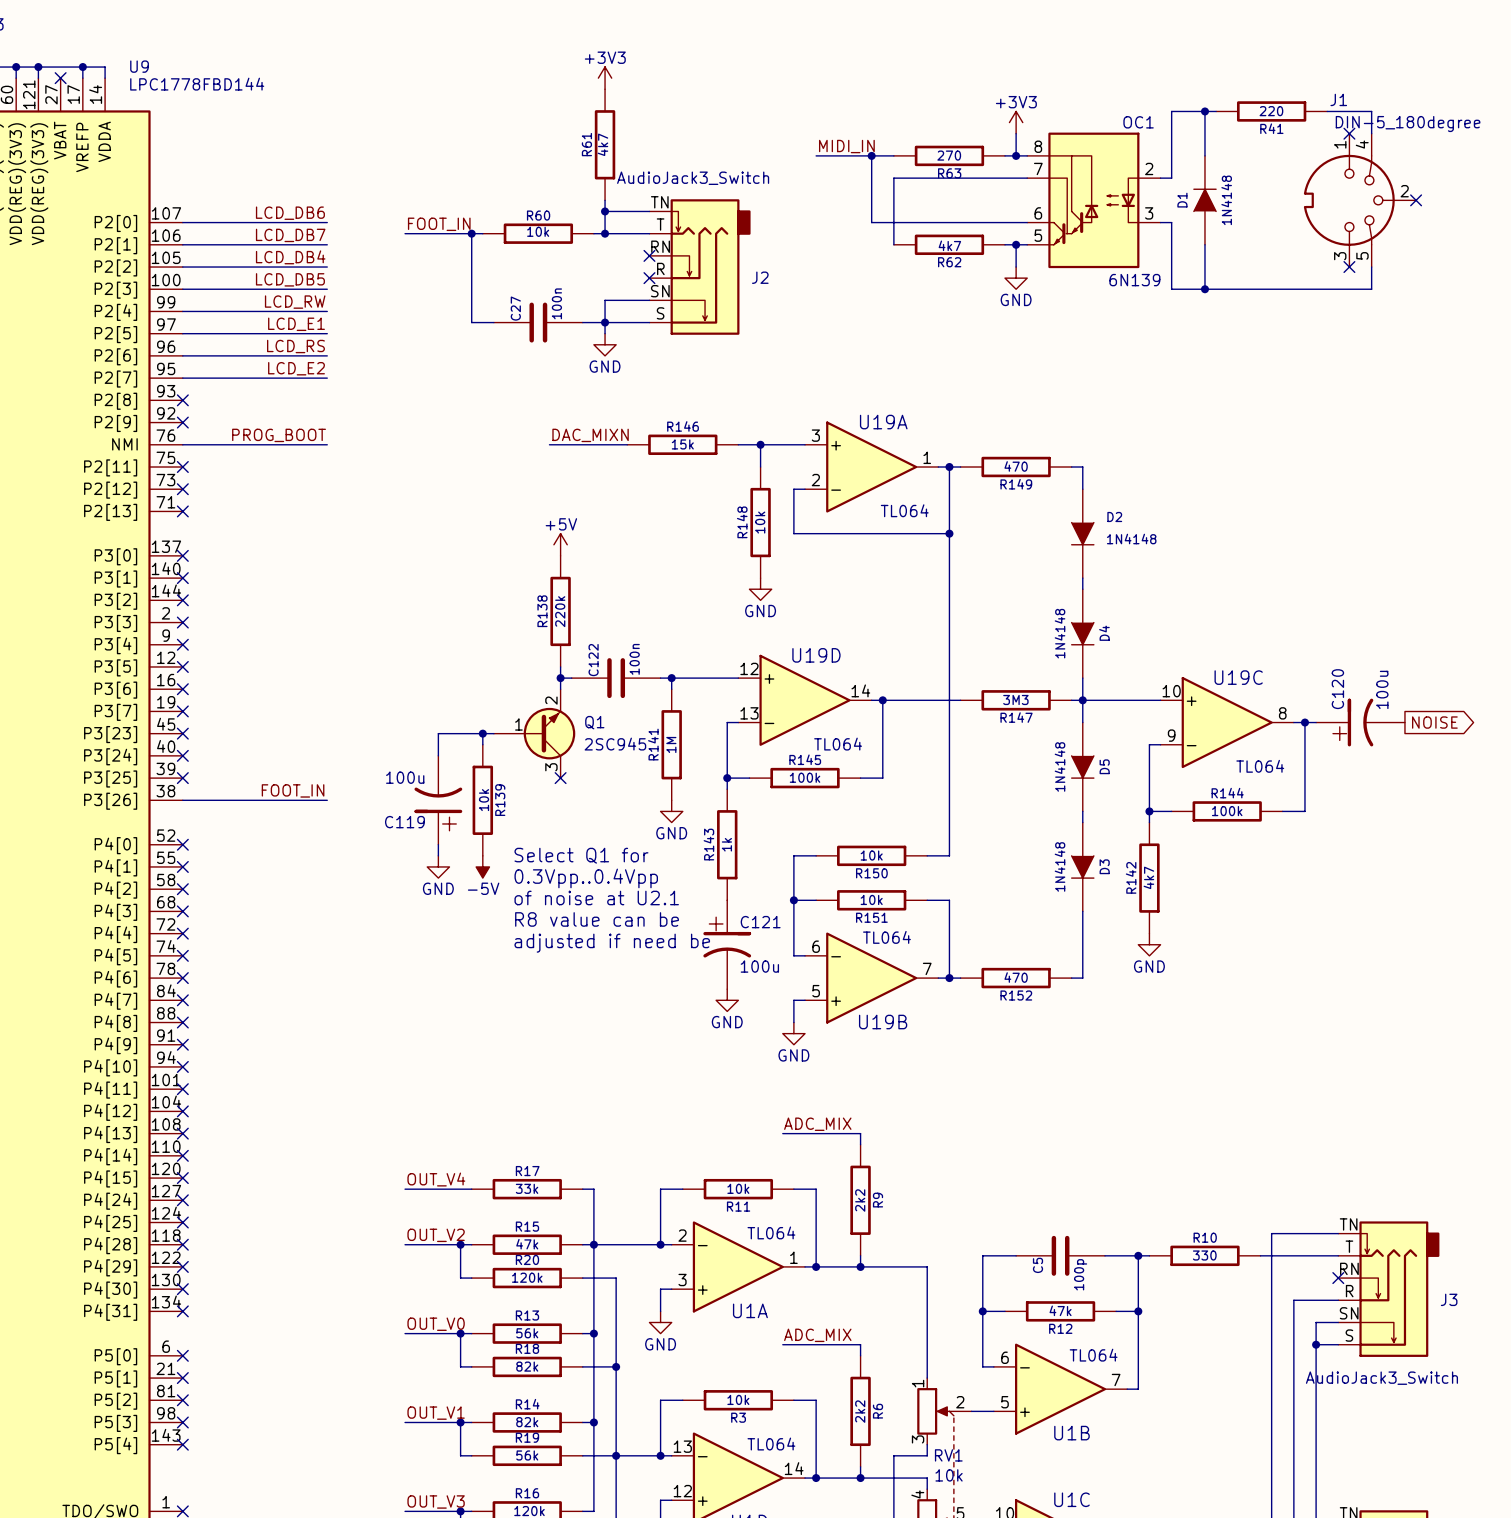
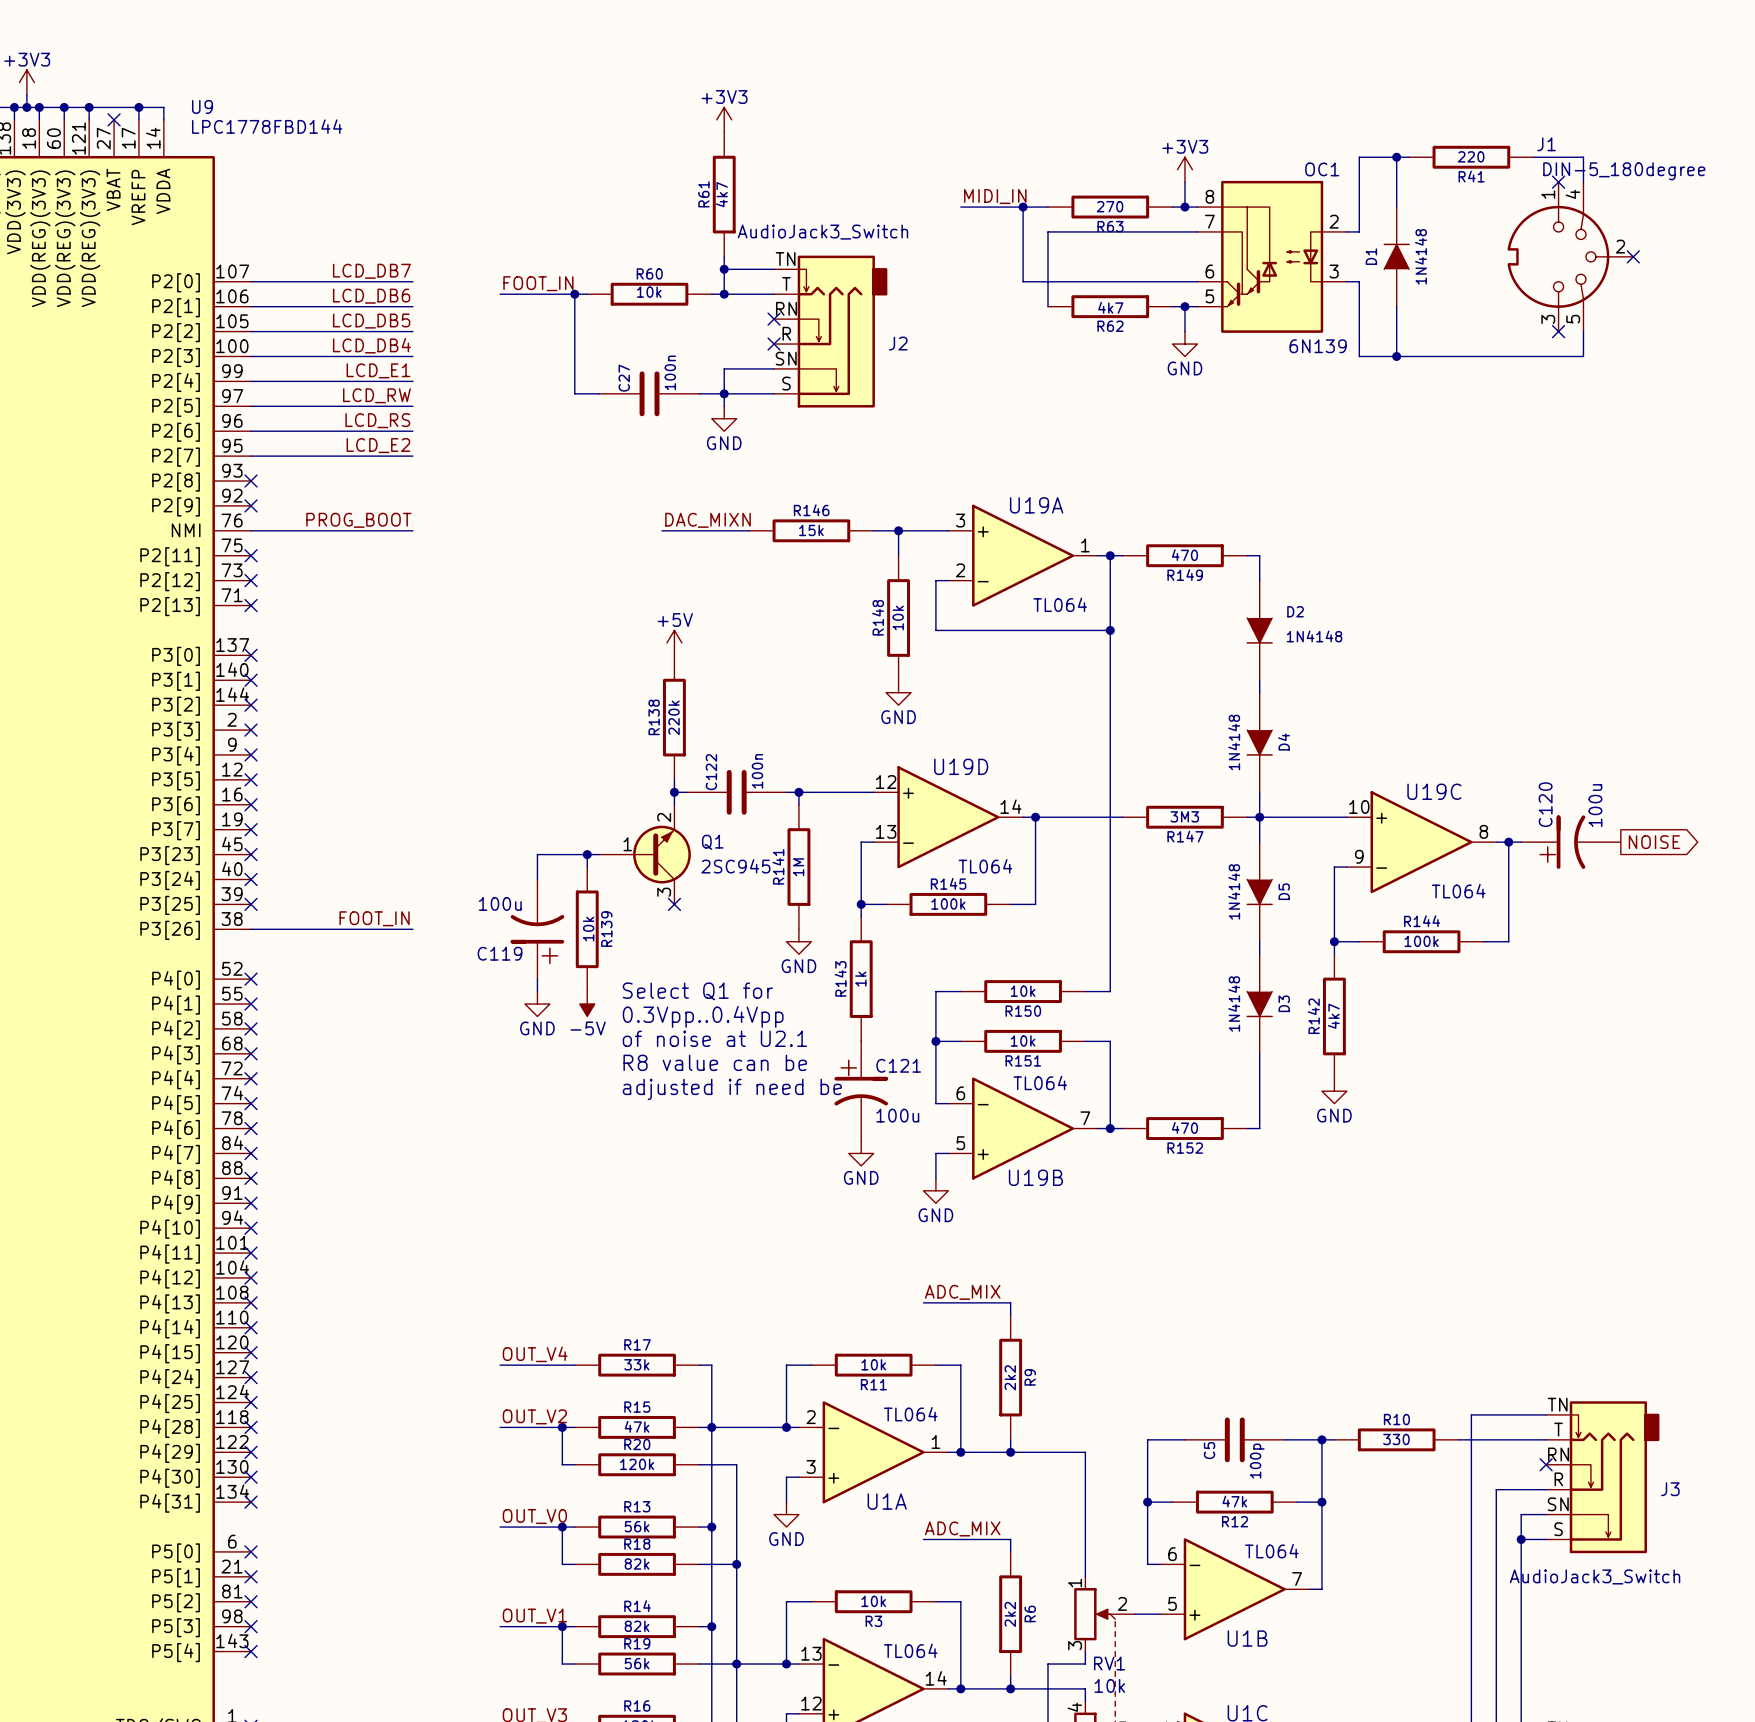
label: LCD_DB6 (290, 213) -> LCD_DB7 (371, 271)
label: LCD_DB7 (290, 235) -> LCD_DB6 (371, 296)
label: LCD_DB4 (290, 257) -> LCD_DB5 (371, 321)
label: LCD_DB5 (290, 279) -> LCD_DB4 (371, 345)
label: LCD_RW (295, 302) -> LCD_E1 (378, 370)
label: LCD_E1 (296, 324) -> LCD_RW (376, 395)

